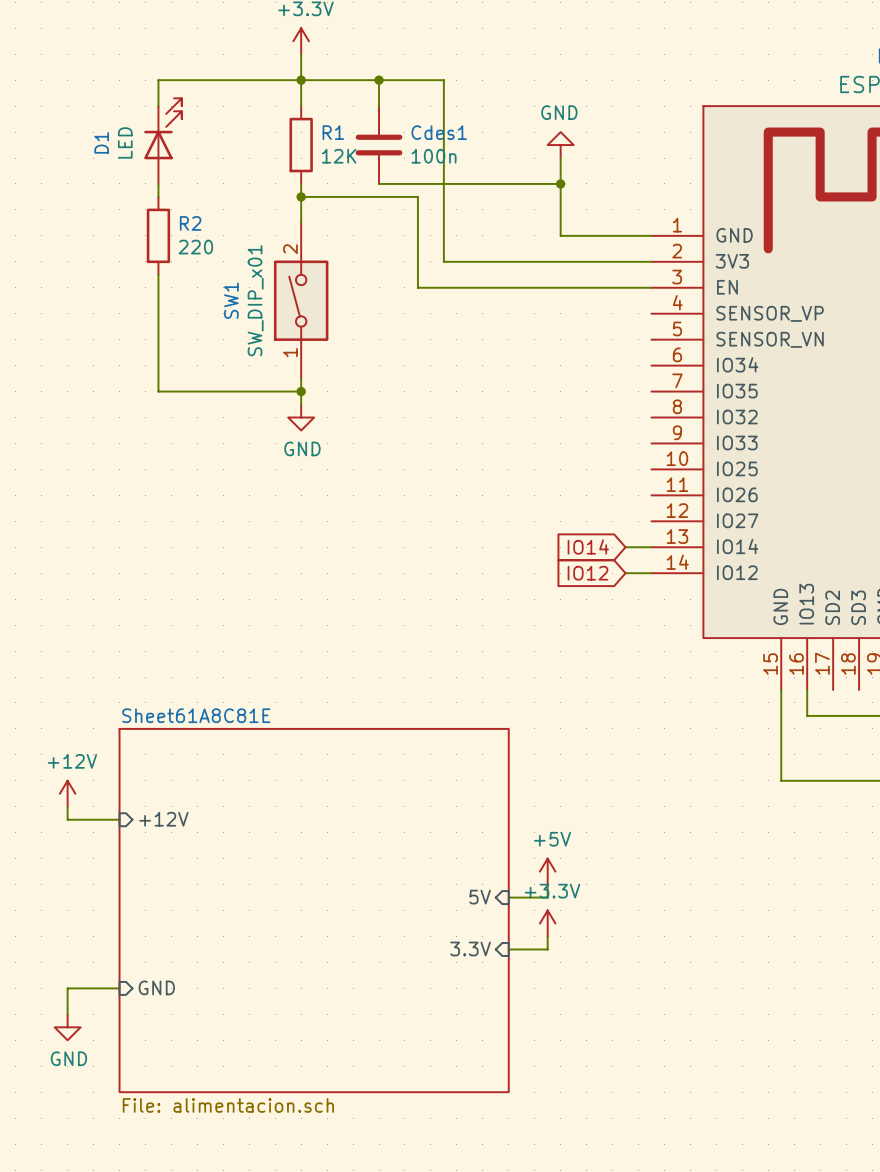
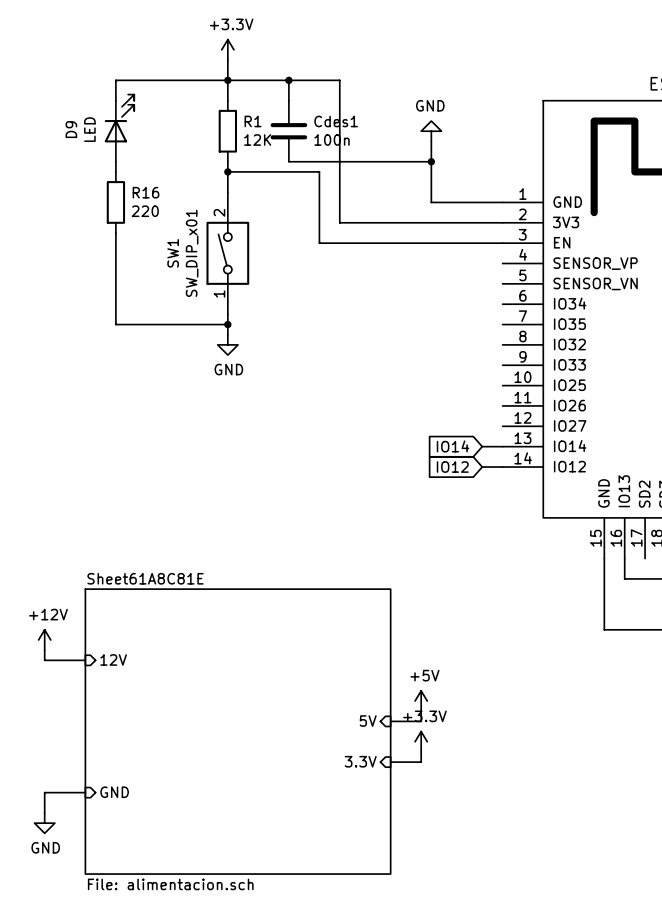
D1 name: D1 (101, 142) -> D9 (71, 129)
R2 name: R2 (190, 223) -> R16 (145, 192)
sheet pin: +12V (163, 819) -> 12V (113, 659)

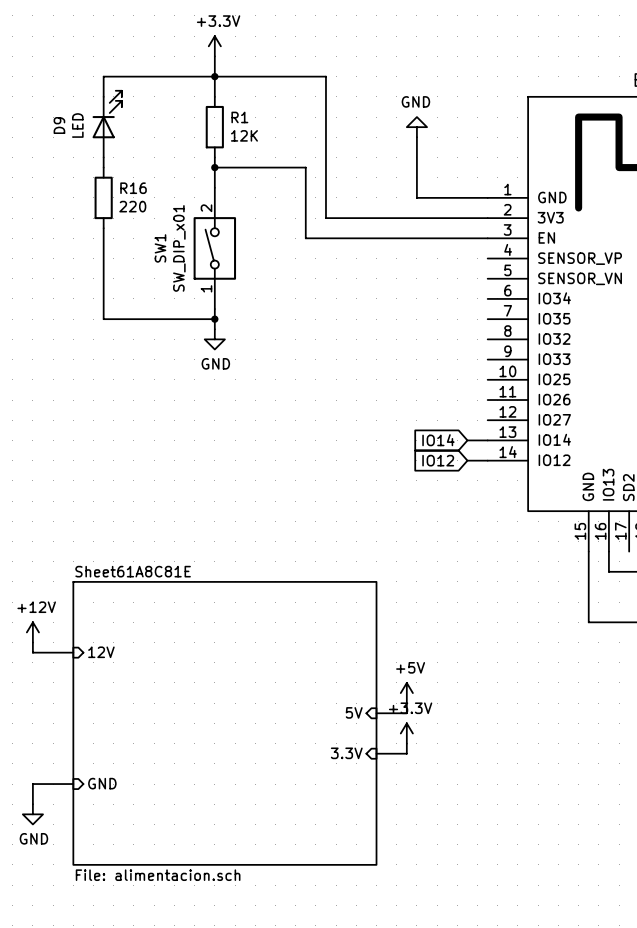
wire: (288, 80) (288, 100) -> none
junction: (288, 80) -> none
Cdes1: 100n (288, 131) -> none
wire: (288, 161) (431, 161) -> none
junction: (431, 161) -> none

